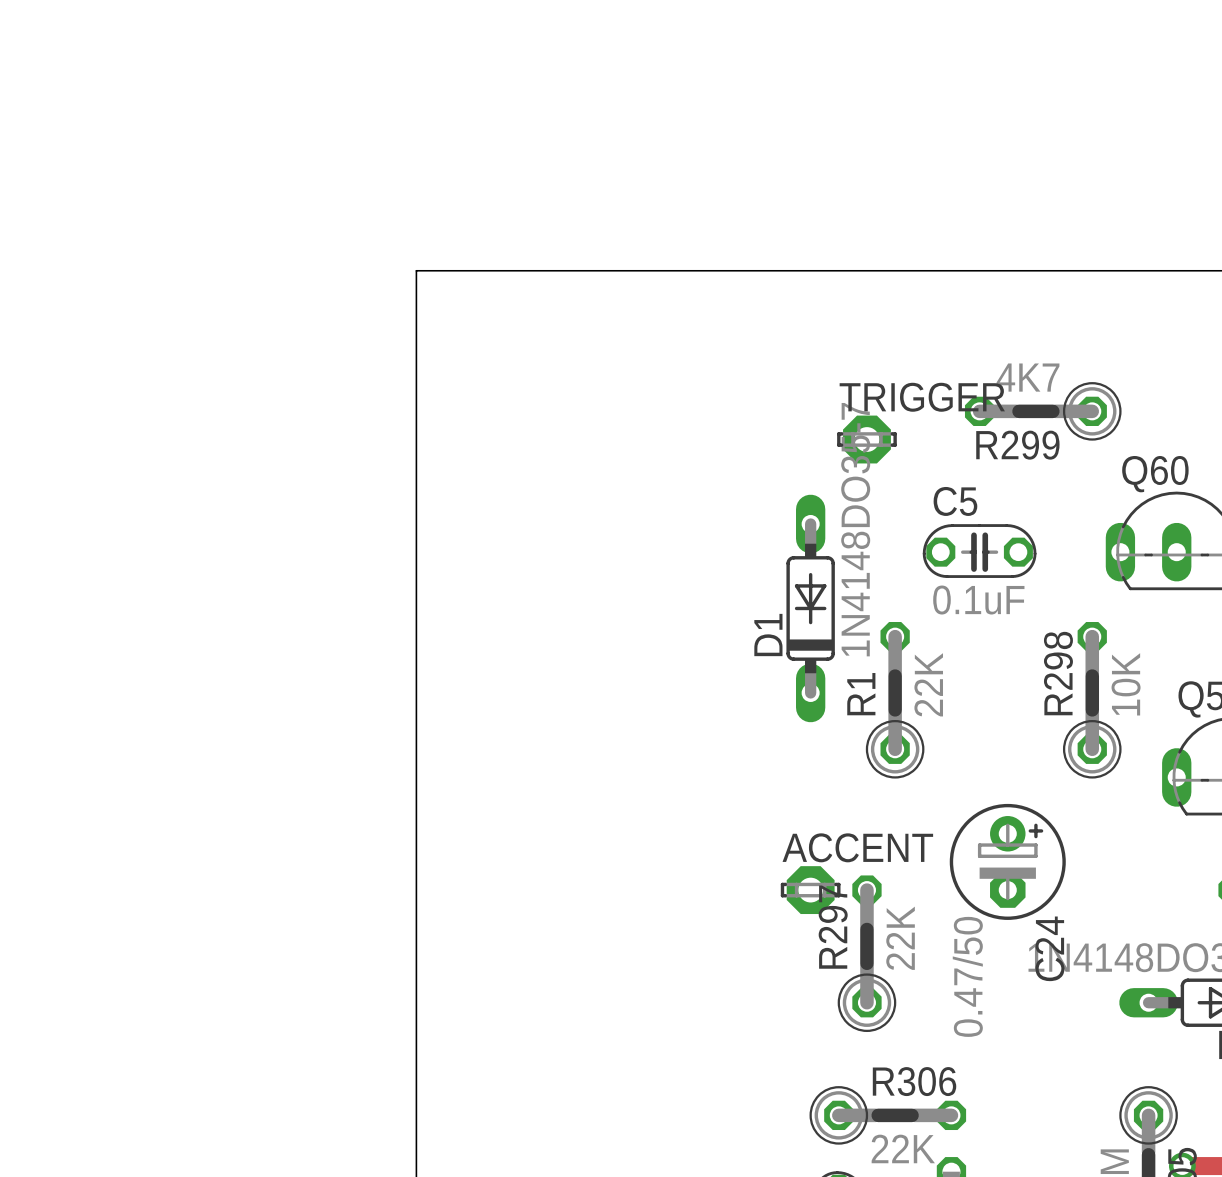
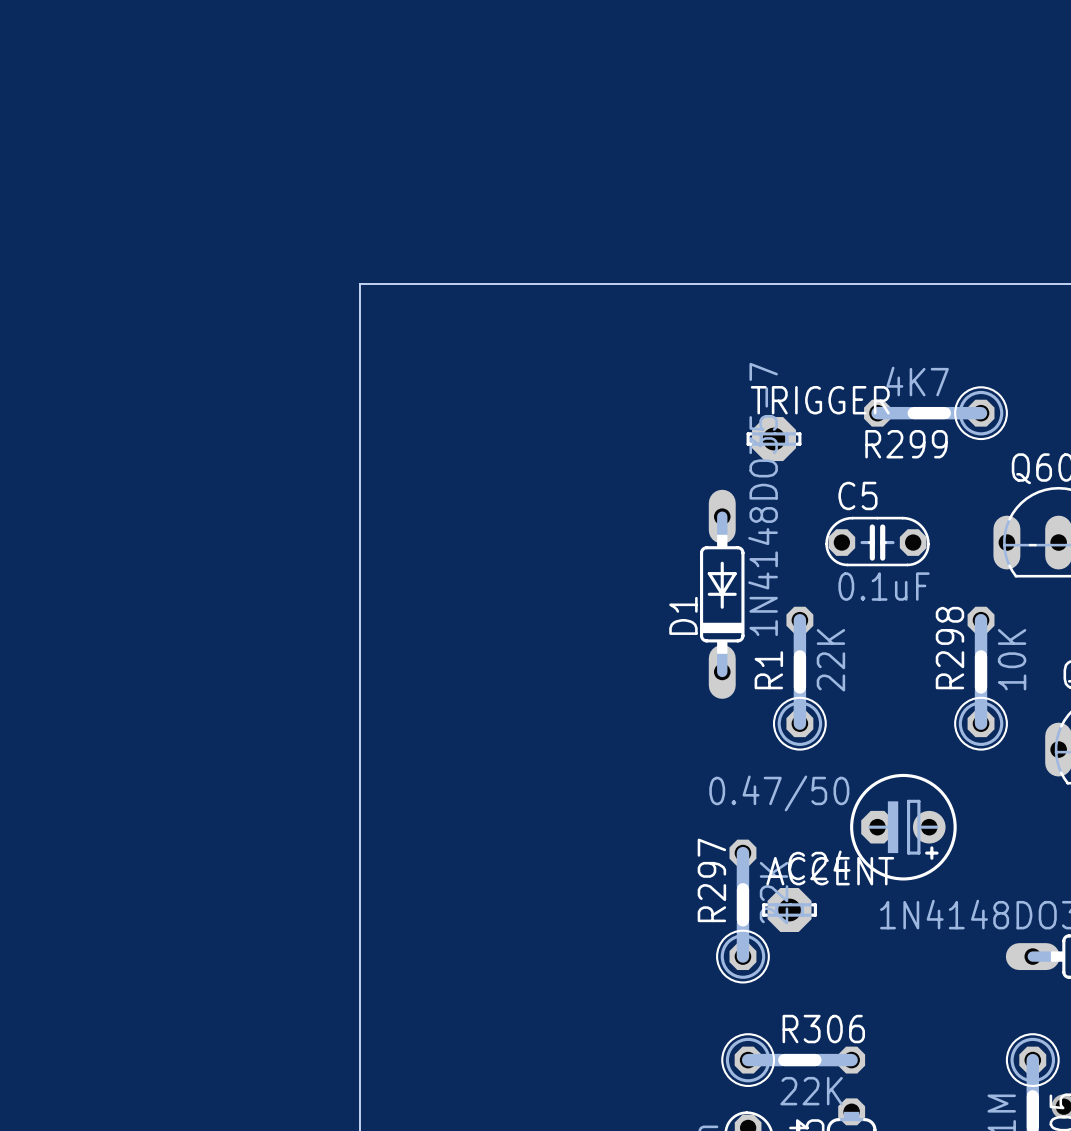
C24 rotation: 0° (1007, 861) -> 90° clockwise (903, 827)
ACCENT position: (810, 890) -> (789, 910)
R297 position: (866, 953) -> (742, 911)

